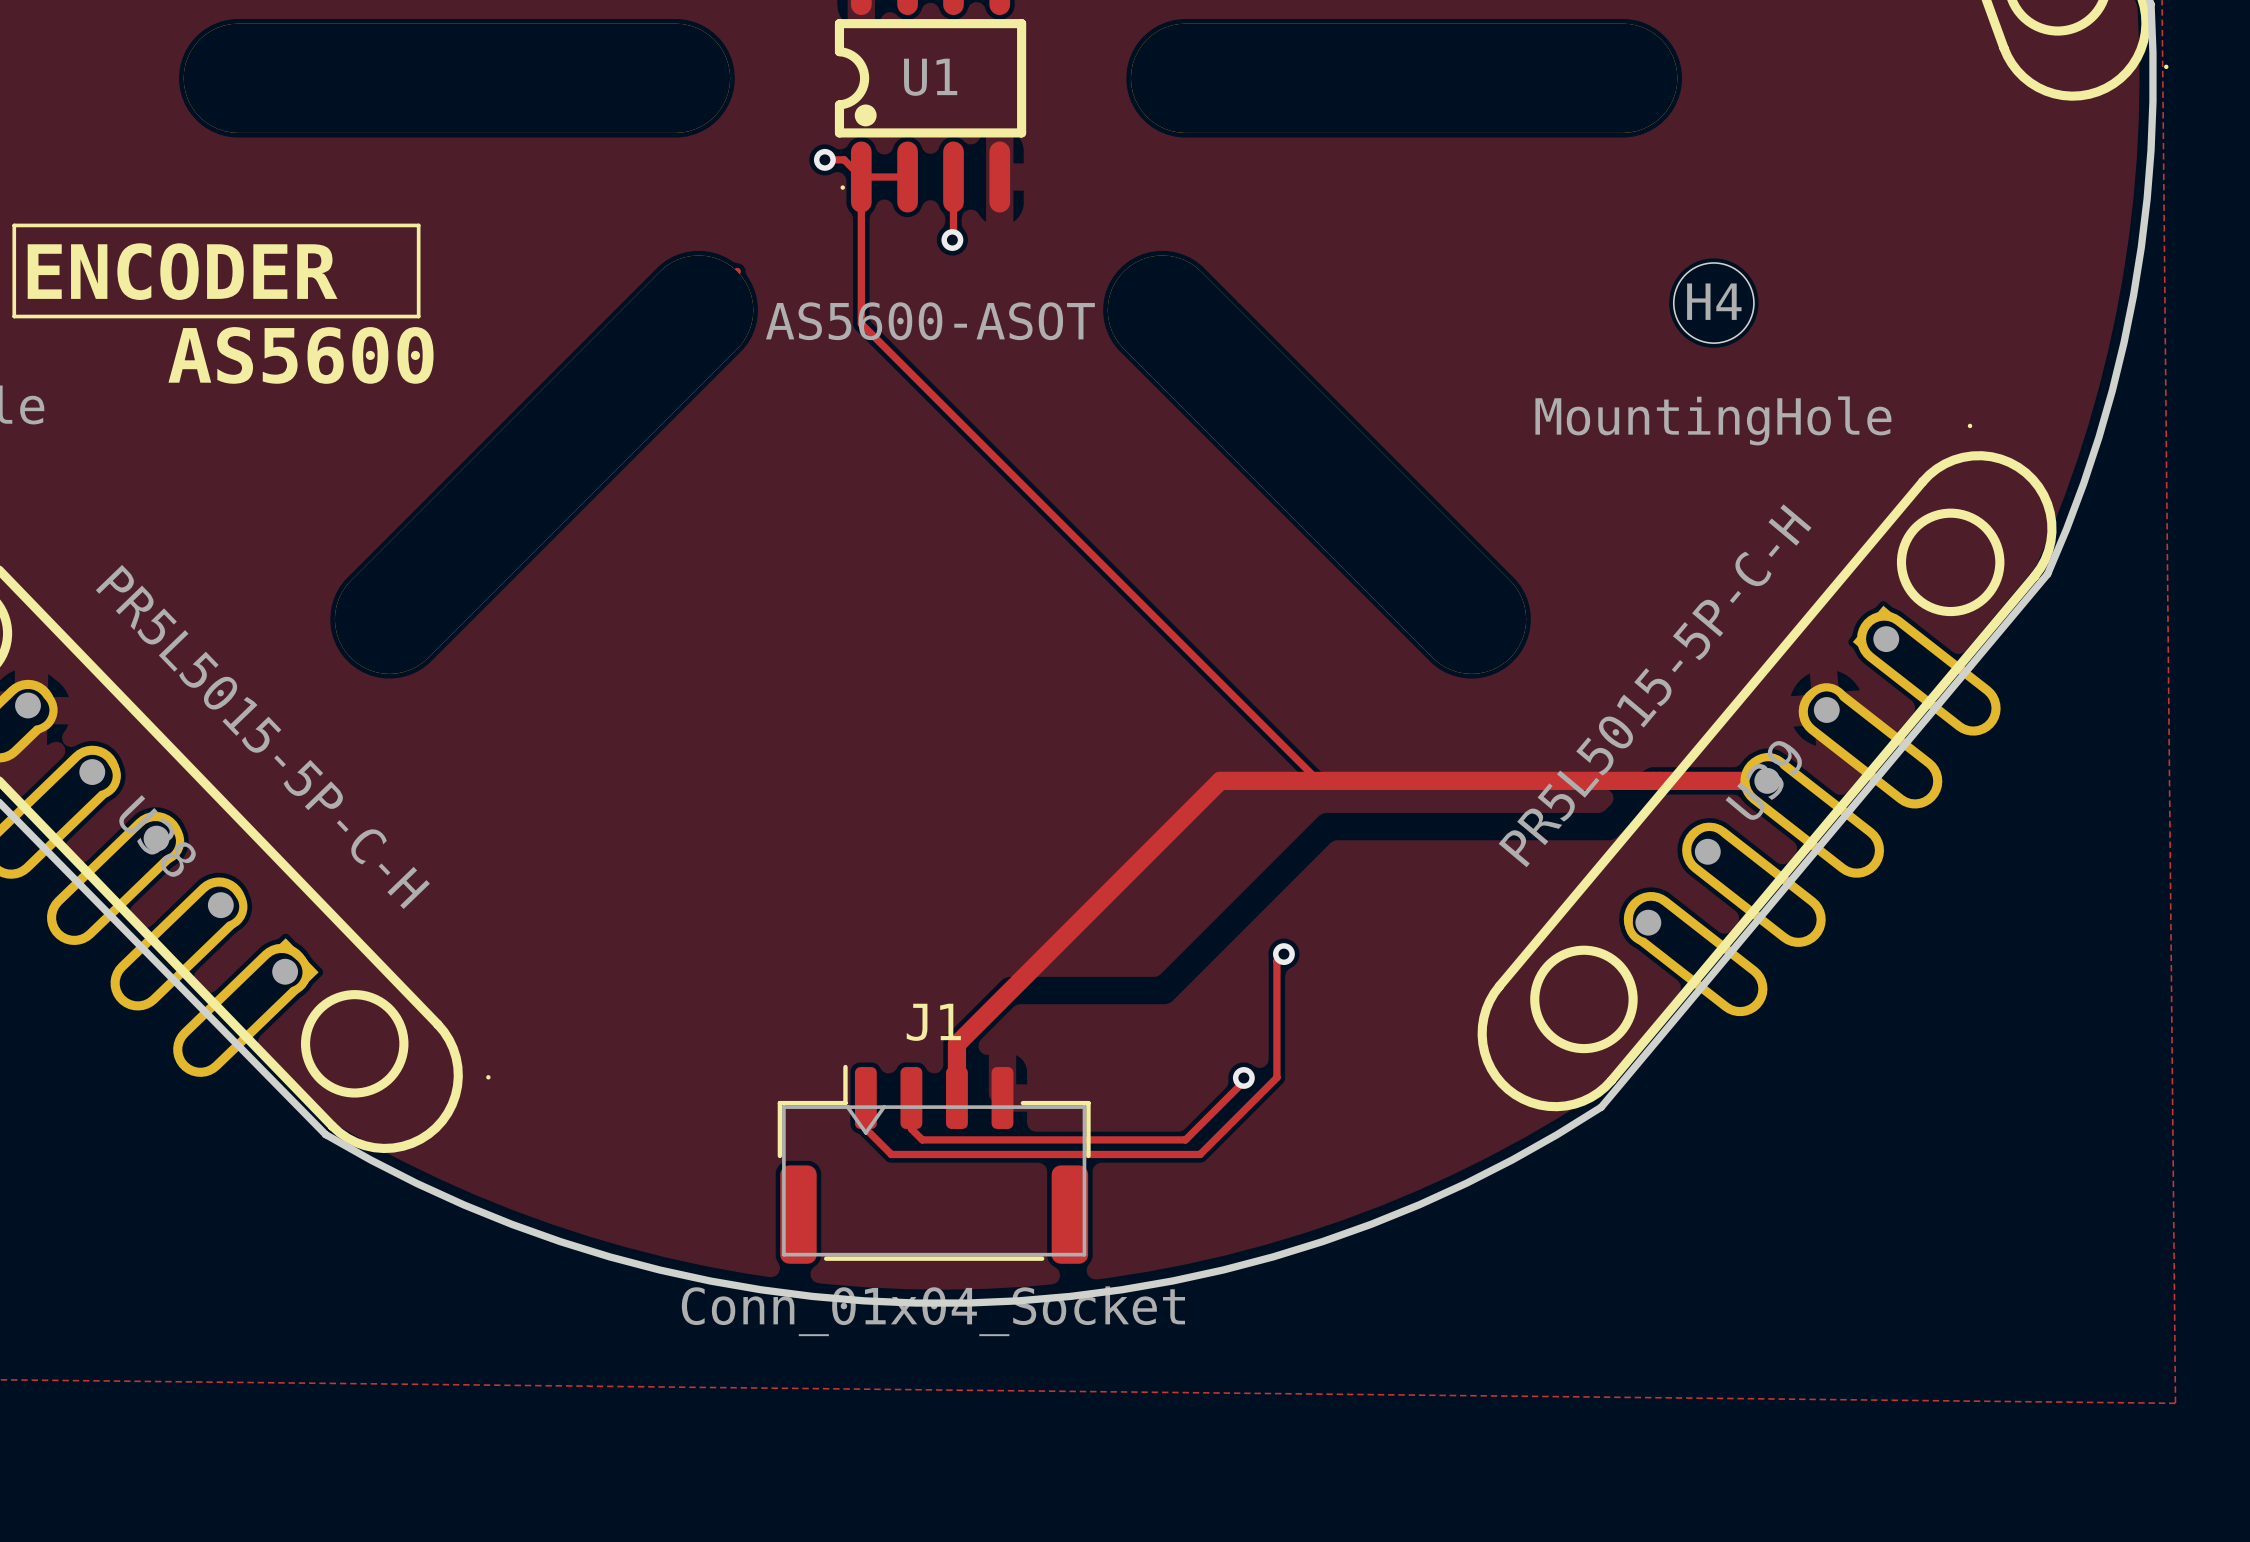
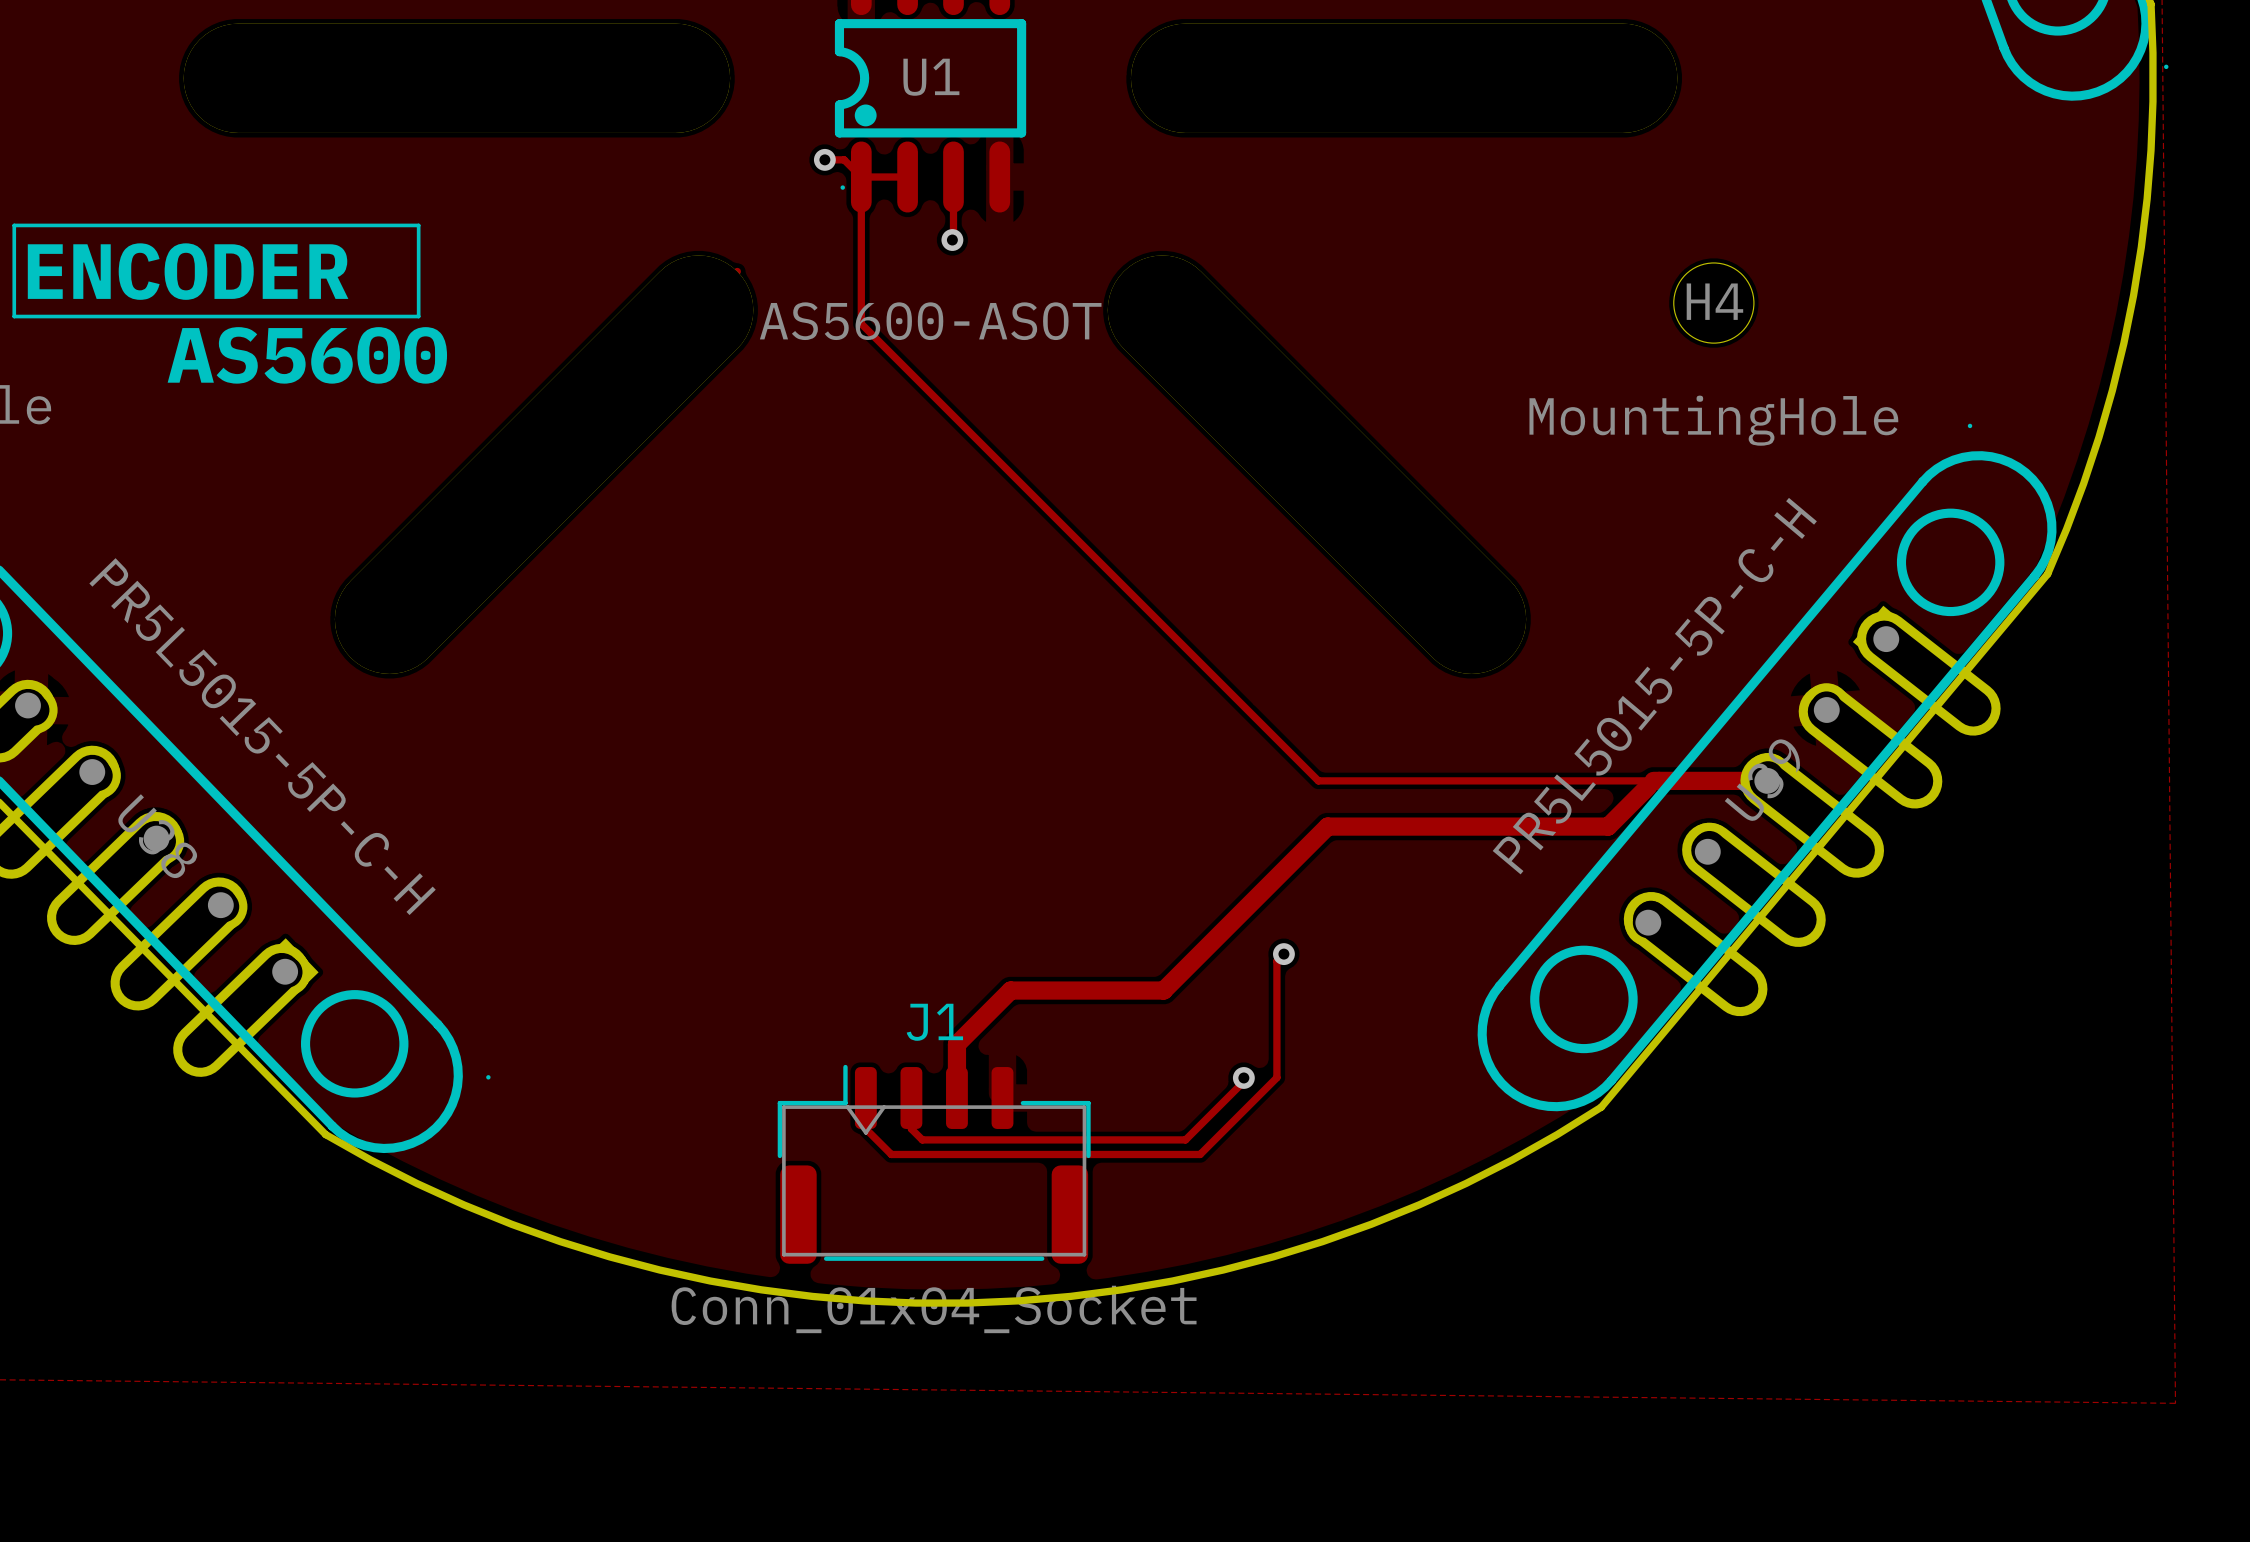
track: (1653, 780) (1220, 780) (1010, 990) -> (1648, 786) (1608, 826) (1327, 826) (1163, 990) (1010, 990)

